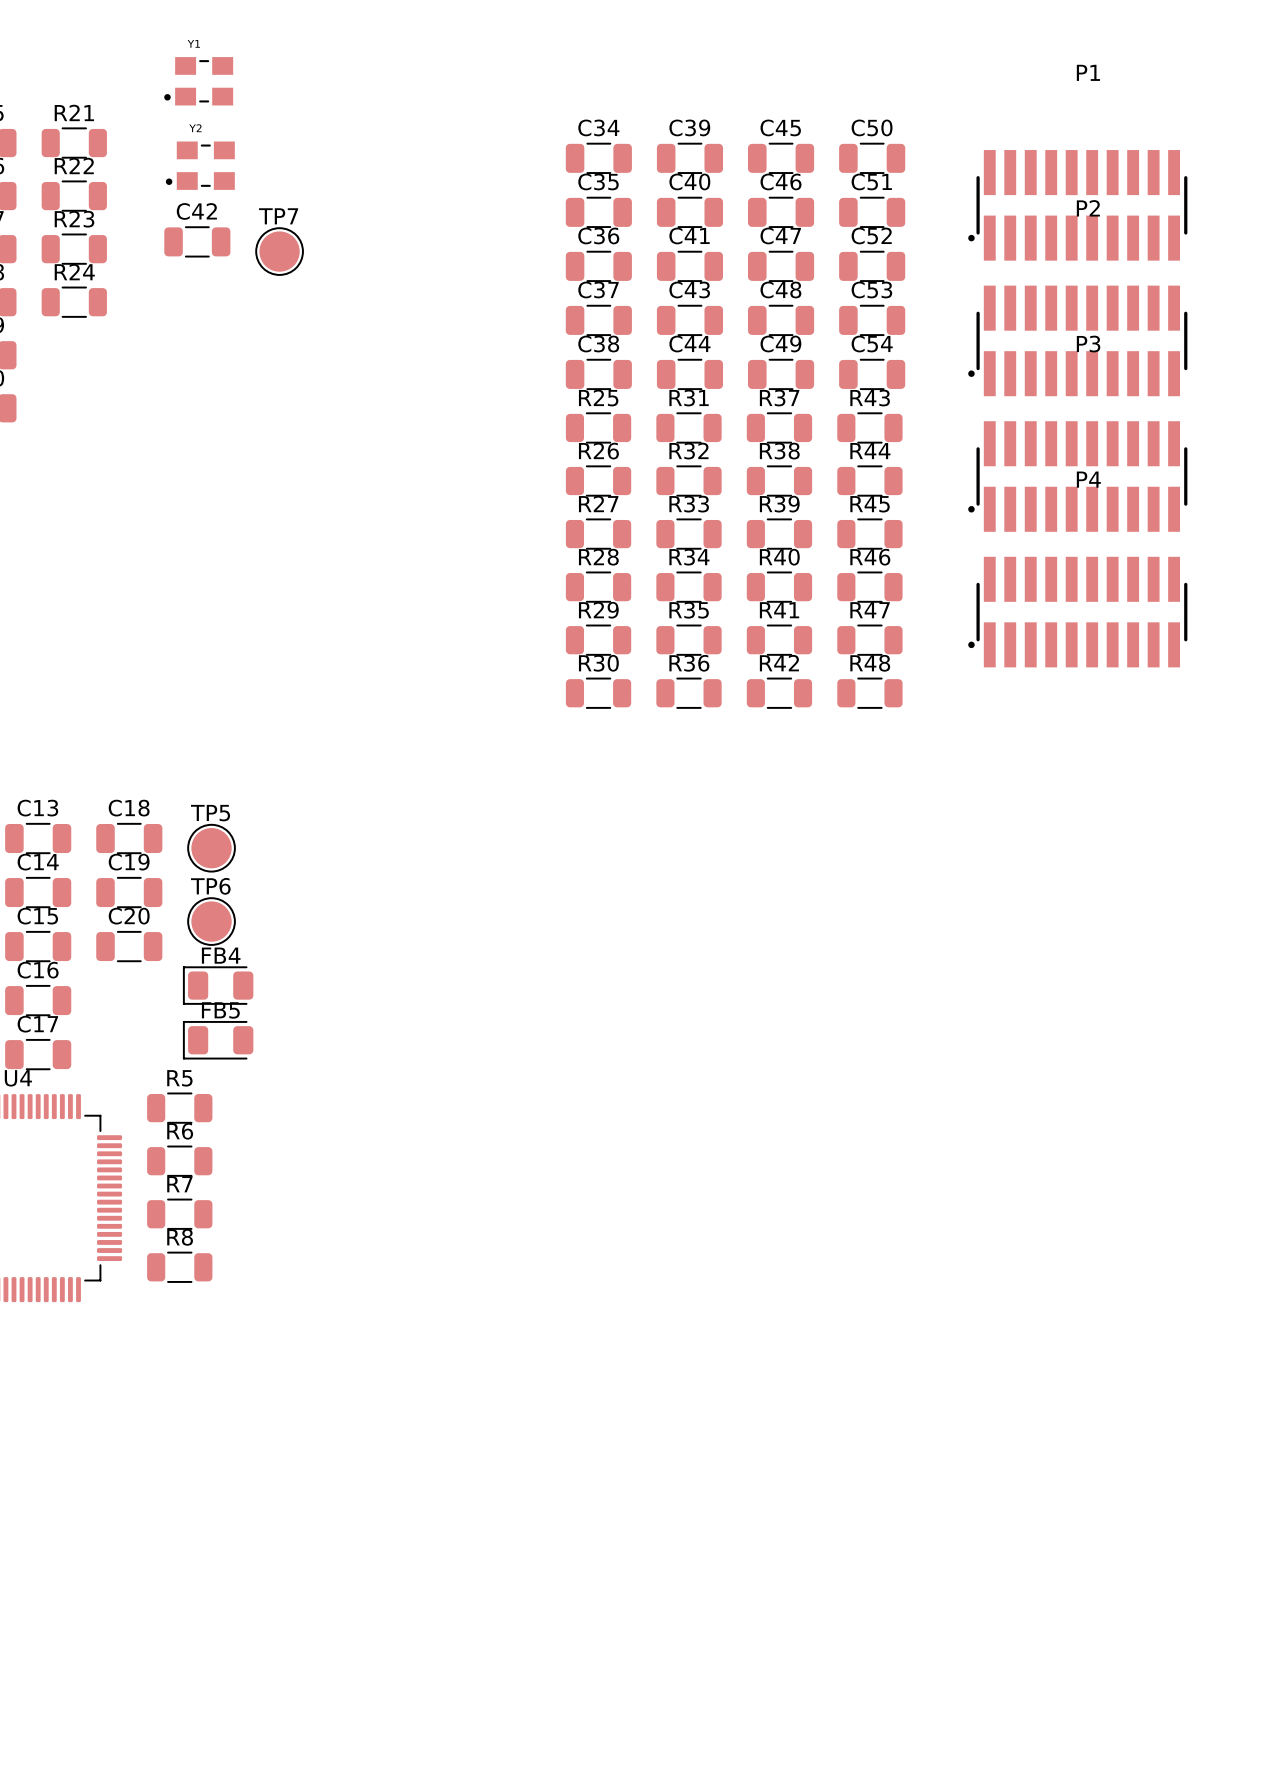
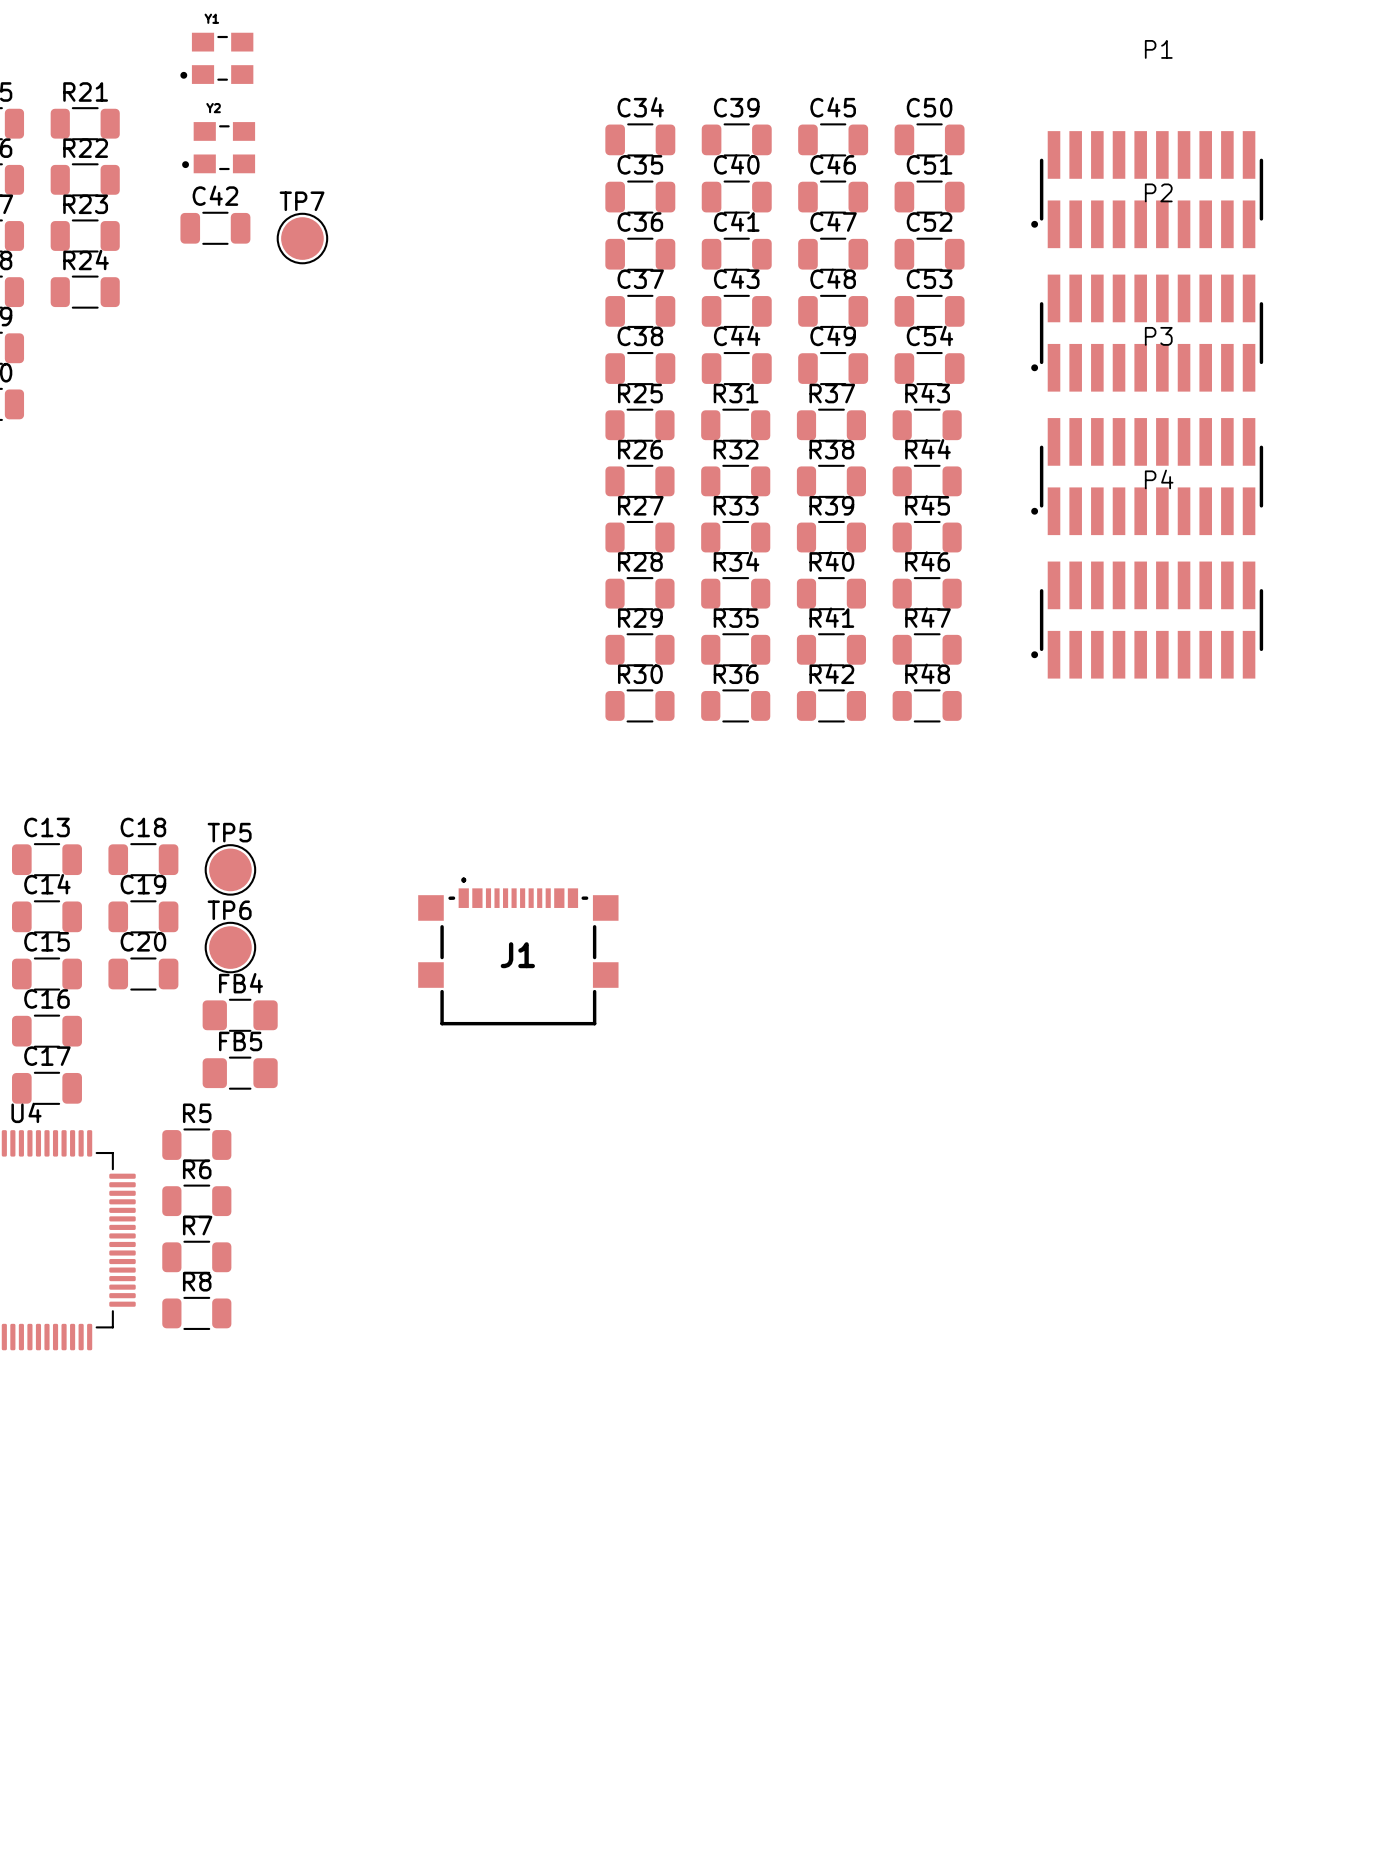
J1: none -> (518, 951)
FB4 footprint: [182, 966, 254, 1005] -> [202, 998, 278, 1032]
FB5 footprint: [182, 1020, 254, 1060] -> [202, 1056, 278, 1090]

